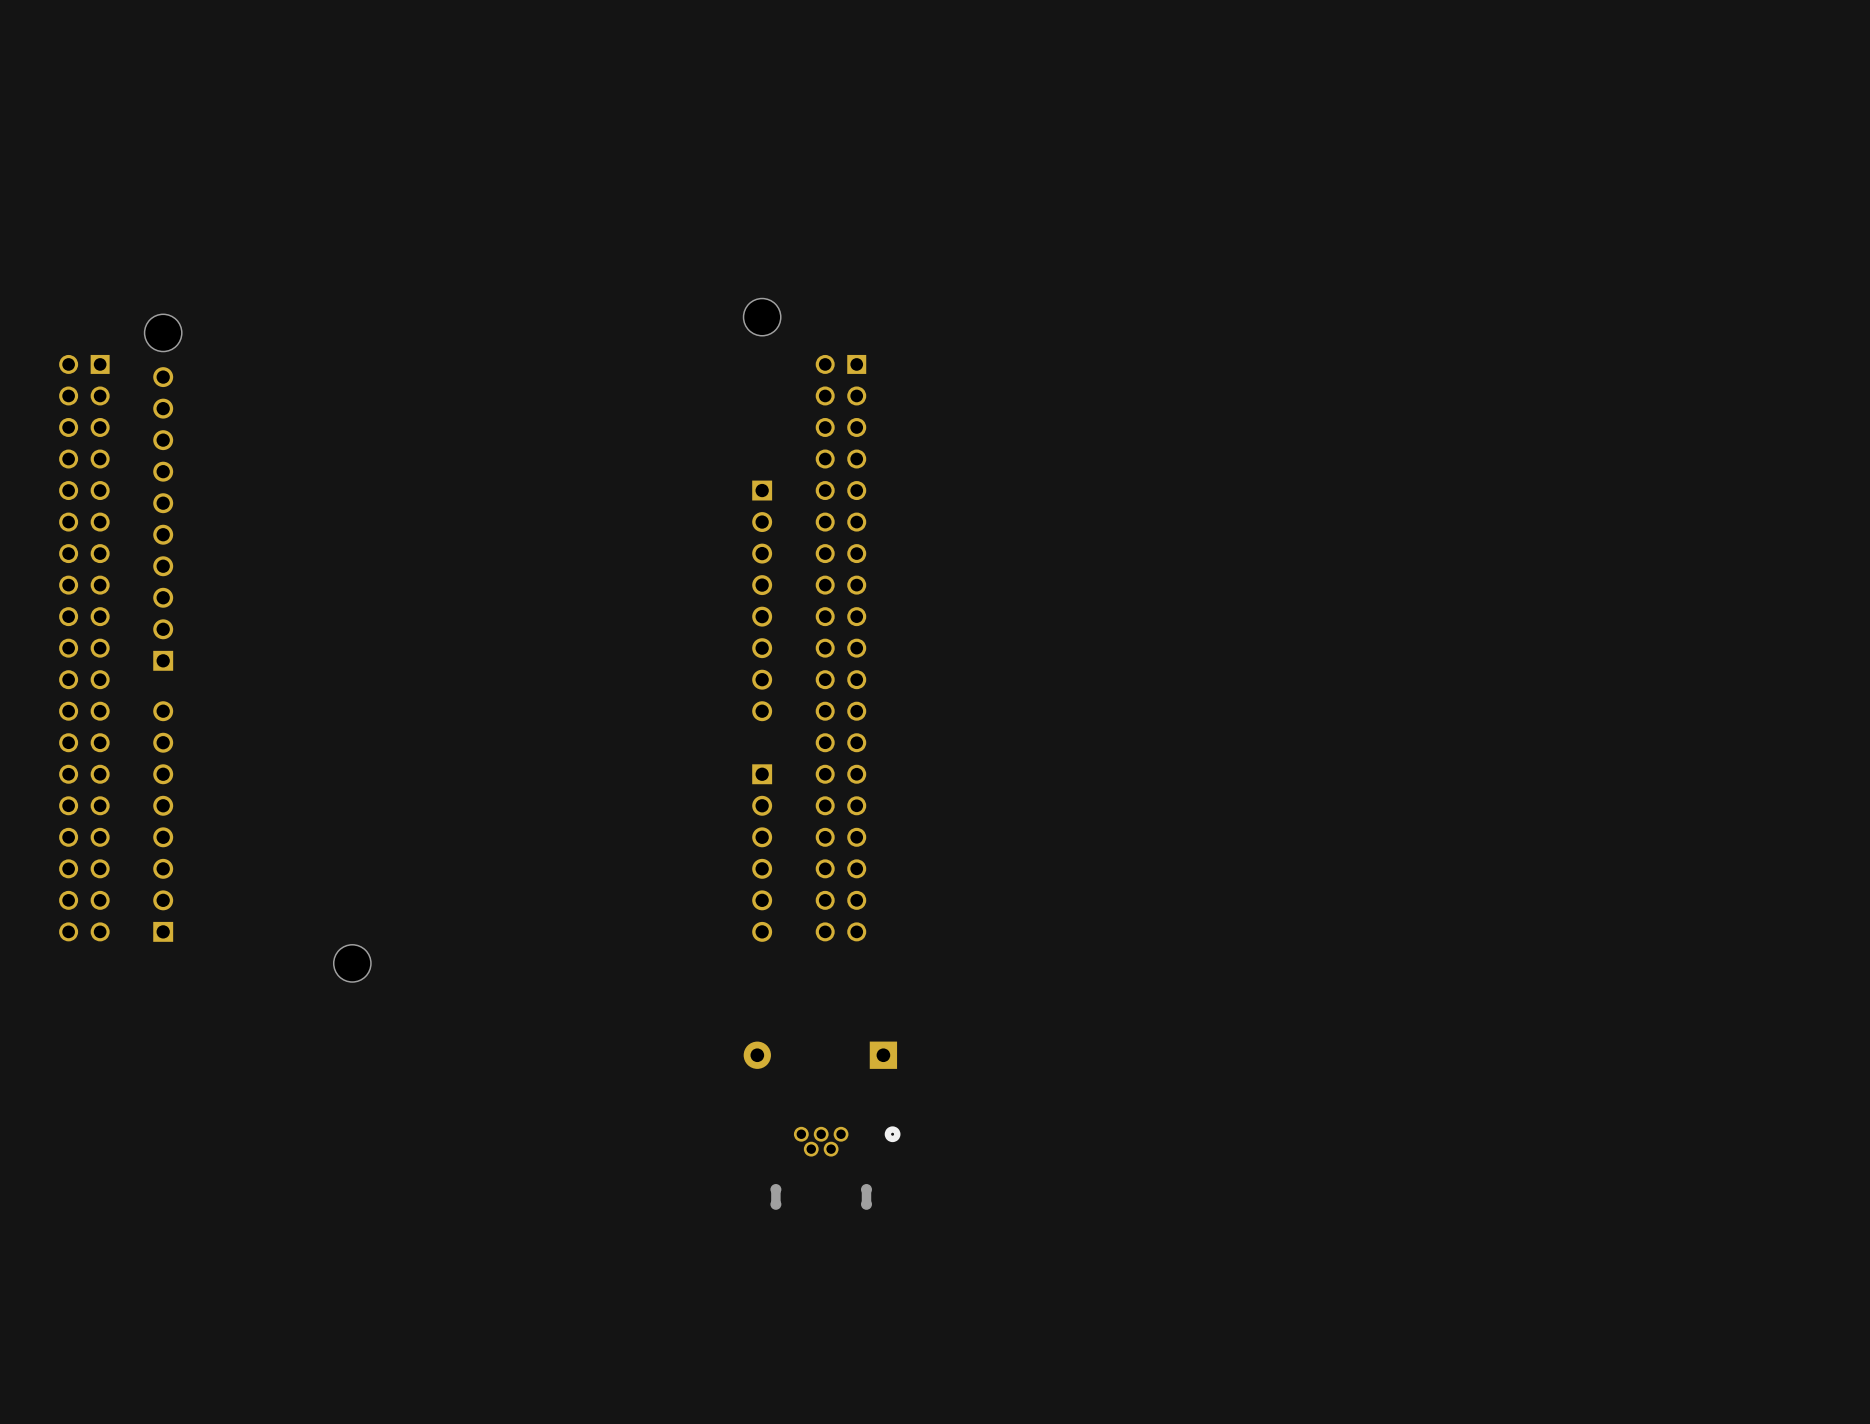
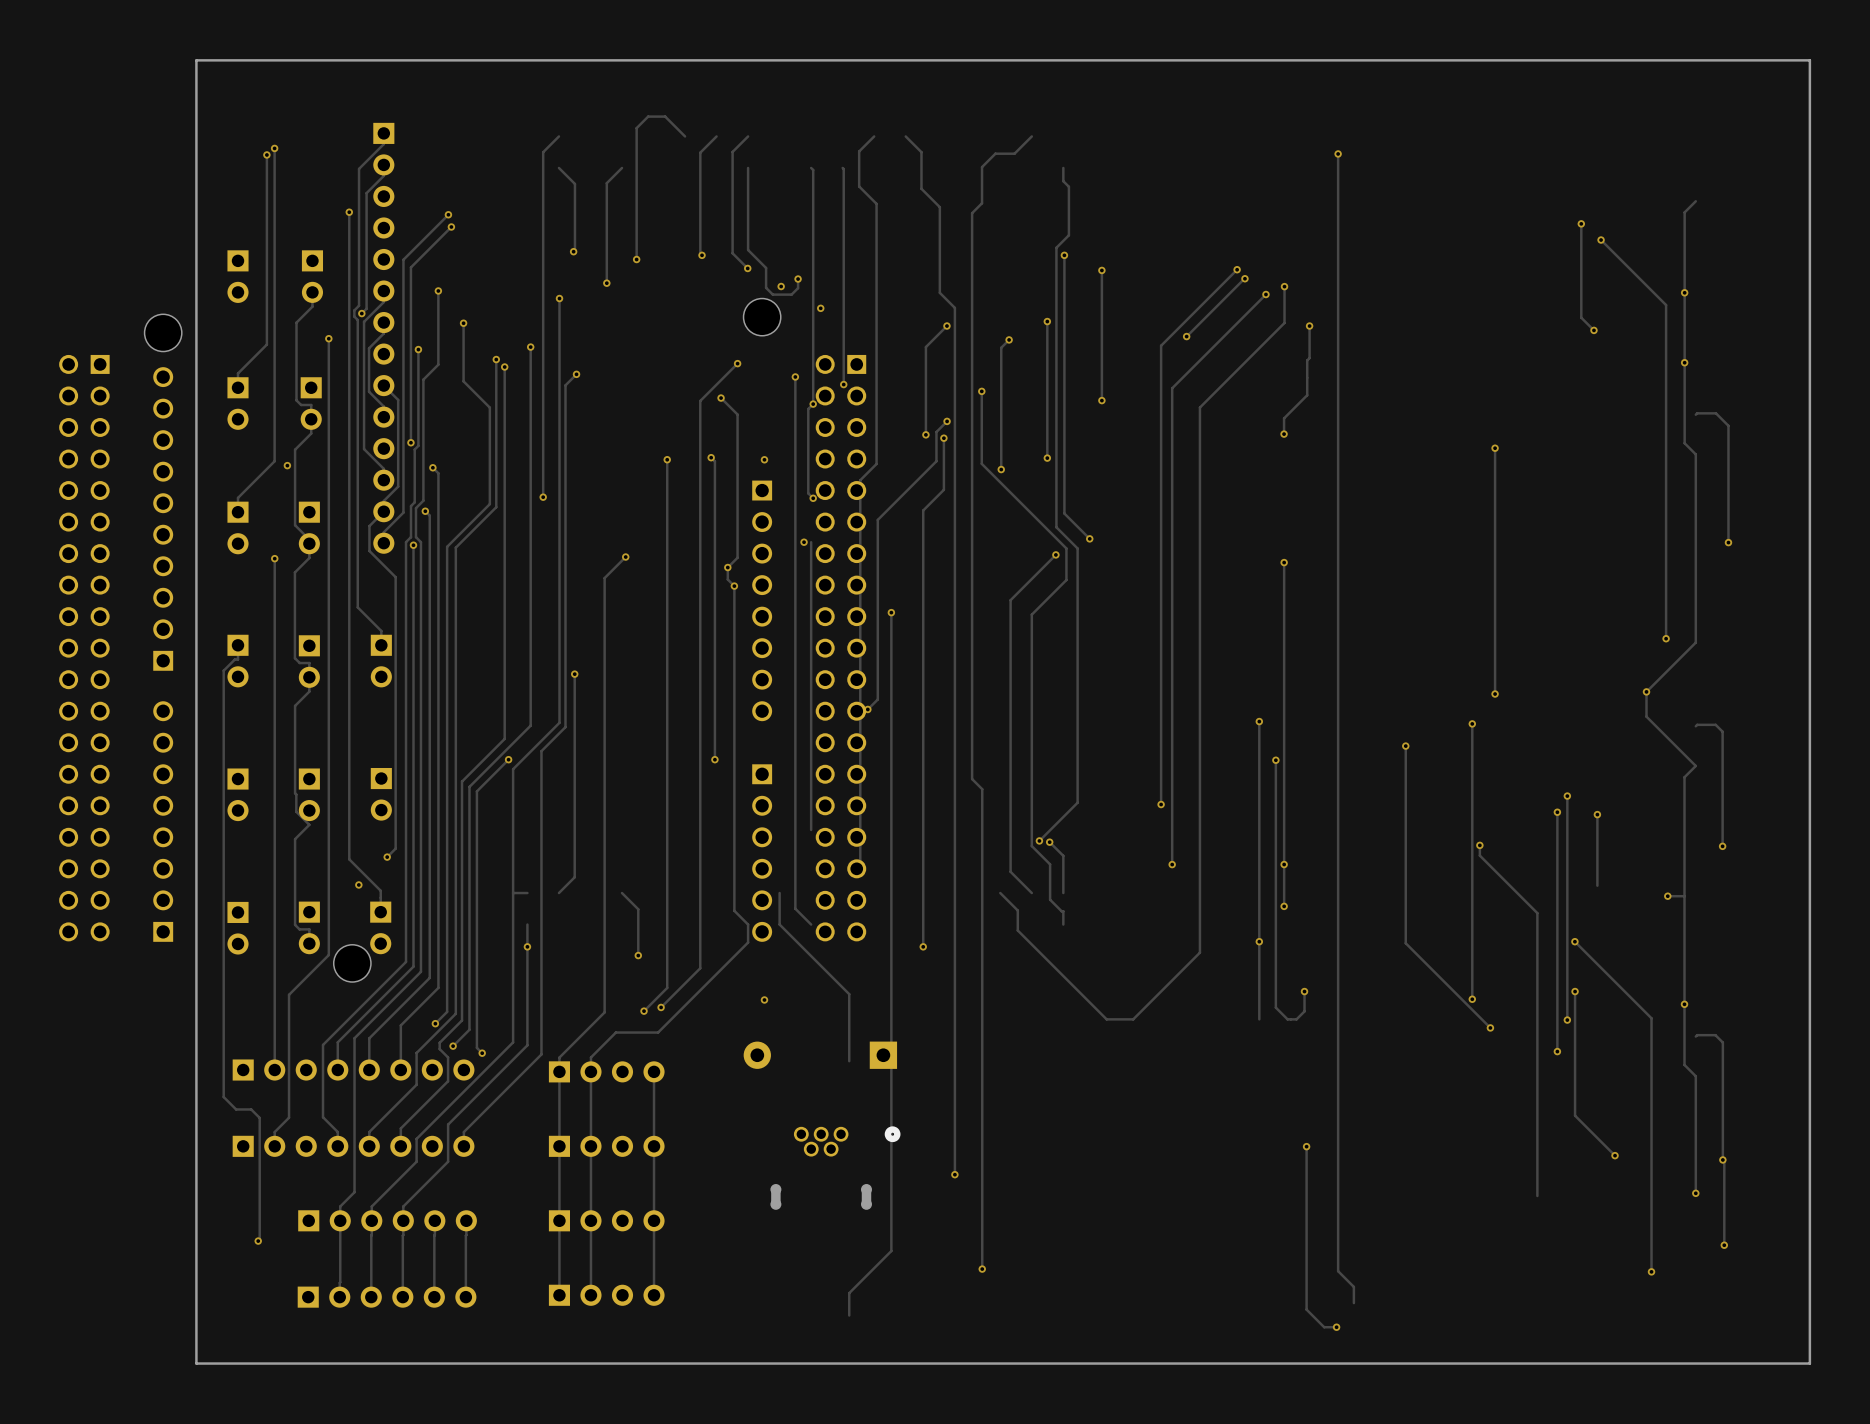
board edge: none -> (1809, 60) (196, 60) (196, 1363) (1809, 1363) (1809, 60)
track: none -> (383, 133) (383, 144) (359, 168) (359, 305) (354, 310) (354, 316) (357, 320) (357, 607) (381, 631) (381, 645)
track: none -> (558, 136) (543, 152) (543, 497)
track: none -> (685, 136) (665, 116) (648, 116) (636, 128) (636, 259)
track: none -> (716, 136) (700, 152) (700, 253) (702, 255)
track: none -> (748, 136) (732, 151) (732, 253) (747, 268)
track: none -> (874, 136) (859, 151) (859, 186) (876, 203) (876, 463) (860, 480) (860, 867)
track: none -> (905, 136) (921, 152) (921, 188) (939, 207) (939, 292) (954, 307) (954, 1174)
track: none -> (1031, 136) (1014, 153) (995, 153) (982, 167) (982, 203) (972, 213) (972, 779) (982, 789) (982, 1269)
track: none -> (274, 148) (274, 461) (238, 497) (238, 512)
via: none -> (274, 148)
track: none -> (1338, 153) (1338, 1271) (1353, 1286) (1353, 1303)
via: none -> (1338, 153)
track: none -> (266, 154) (266, 344) (238, 373) (238, 387)
via: none -> (266, 154)
track: none -> (383, 164) (383, 175) (366, 193) (366, 308) (361, 313)
track: none -> (558, 167) (574, 183) (573, 251)
track: none -> (622, 167) (606, 183) (606, 283)
track: none -> (748, 167) (748, 250) (766, 268) (766, 287) (772, 294) (791, 294) (798, 288) (798, 279)
track: none -> (811, 167) (813, 170) (813, 404) (808, 409) (808, 493) (813, 498)
track: none -> (842, 167) (843, 384)
track: none -> (1063, 167) (1063, 181) (1068, 186) (1068, 235) (1056, 247) (1056, 527) (1077, 548) (1077, 802) (1039, 840)
track: none -> (1695, 201) (1684, 212) (1684, 443) (1695, 454) (1695, 642) (1646, 691) (1646, 716) (1695, 765) (1684, 777) (1684, 1064) (1695, 1076) (1695, 1193)
track: none -> (349, 212) (349, 859) (380, 890) (380, 912)
via: none -> (349, 212)
track: none -> (448, 214) (403, 259) (403, 512) (383, 532) (383, 543)
via: none -> (448, 214)
track: none -> (1581, 223) (1581, 317) (1593, 330)
via: none -> (1581, 223)
track: none -> (451, 226) (410, 267) (410, 442)
via: none -> (451, 226)
track: none -> (1601, 240) (1666, 305) (1666, 638)
via: none -> (1601, 240)
via: none -> (573, 251)
via: none -> (702, 255)
track: none -> (1064, 255) (1064, 513) (1089, 538)
via: none -> (1064, 255)
via: none -> (636, 259)
via: none -> (747, 268)
track: none -> (1237, 269) (1161, 345) (1161, 804)
via: none -> (1237, 269)
track: none -> (1101, 270) (1101, 400)
via: none -> (1101, 270)
part: none -> (238, 276)
part: none -> (312, 276)
track: none -> (1244, 278) (1186, 336)
via: none -> (1244, 278)
via: none -> (798, 279)
via: none -> (606, 283)
via: none -> (781, 286)
track: none -> (1284, 286) (1284, 322) (1199, 407) (1199, 952) (1133, 1019) (1106, 1019) (1017, 930) (1017, 910) (1000, 893)
via: none -> (1284, 286)
track: none -> (438, 290) (438, 364) (423, 379) (423, 500) (415, 508) (415, 537) (420, 542) (420, 971) (354, 1038) (354, 1192) (340, 1206) (339, 1297)
via: none -> (438, 290)
track: none -> (383, 291) (383, 302) (364, 321) (364, 449) (383, 468) (383, 480)
track: none -> (312, 292) (312, 306) (296, 322) (296, 400) (301, 405) (311, 405) (311, 433) (295, 449) (295, 525) (309, 539) (309, 558) (294, 572) (294, 658) (299, 663) (309, 663) (309, 691) (295, 705) (296, 811) (309, 824) (295, 839) (295, 924) (299, 929) (309, 929) (309, 943)
via: none -> (1684, 292)
track: none -> (1265, 294) (1172, 388) (1172, 864)
via: none -> (1265, 294)
track: none -> (559, 298) (559, 722) (513, 769) (513, 1042) (416, 1138) (416, 1161) (371, 1206) (371, 1297)
via: none -> (559, 298)
via: none -> (820, 308)
via: none -> (361, 313)
track: none -> (1047, 321) (1047, 458)
via: none -> (1047, 321)
track: none -> (383, 322) (383, 333) (369, 348) (369, 391) (383, 406) (383, 417)
track: none -> (463, 323) (463, 381) (489, 407) (489, 504) (447, 546) (447, 1011) (435, 1023)
via: none -> (463, 323)
track: none -> (946, 326) (925, 347) (925, 434)
via: none -> (946, 326)
track: none -> (1309, 326) (1307, 395) (1284, 418) (1284, 434)
via: none -> (1309, 326)
via: none -> (1593, 330)
via: none -> (1186, 336)
track: none -> (328, 338) (328, 955) (289, 994) (289, 1117) (274, 1132) (274, 1146)
via: none -> (328, 338)
part: none -> (383, 338)
track: none -> (1009, 339) (1001, 347) (1001, 469)
via: none -> (1009, 339)
track: none -> (530, 347) (530, 725) (469, 786) (469, 1029) (453, 1046)
via: none -> (530, 347)
track: none -> (418, 349) (418, 445) (414, 449) (414, 502) (411, 506) (411, 537) (406, 542) (406, 961) (323, 1044) (323, 1117) (337, 1132) (337, 1146)
via: none -> (418, 349)
track: none -> (496, 359) (496, 507) (455, 547) (455, 1013) (416, 1053) (416, 1084) (369, 1132) (369, 1146)
via: none -> (496, 359)
via: none -> (1684, 362)
track: none -> (737, 363) (700, 400) (700, 968) (661, 1007)
via: none -> (737, 363)
track: none -> (504, 366) (504, 738) (462, 781) (462, 1020) (439, 1042) (439, 1049) (448, 1057) (448, 1081) (400, 1128) (400, 1146)
via: none -> (504, 366)
track: none -> (576, 374) (565, 385) (565, 727) (541, 751) (541, 1054) (463, 1132) (463, 1146)
via: none -> (576, 374)
track: none -> (795, 376) (795, 908) (811, 924)
via: none -> (795, 376)
via: none -> (843, 384)
track: none -> (383, 385) (398, 399) (398, 486) (383, 500) (383, 511) (369, 526) (369, 550) (395, 577) (395, 848) (387, 857)
track: none -> (981, 391) (981, 463) (1066, 548) (1066, 580) (1031, 614) (1031, 846) (1050, 864) (1050, 899) (1063, 911) (1063, 924)
via: none -> (981, 391)
track: none -> (721, 398) (737, 414) (737, 557) (727, 567) (727, 579) (734, 586) (734, 910) (748, 924) (748, 942) (658, 1032) (615, 1032) (590, 1057) (590, 1071) (598, 1071) (590, 1079) (590, 1295)
via: none -> (721, 398)
via: none -> (1101, 400)
part: none -> (238, 403)
part: none -> (311, 403)
via: none -> (813, 404)
track: none -> (1695, 414) (1715, 413) (1728, 425) (1728, 542)
track: none -> (947, 421) (936, 432) (936, 461) (877, 519) (877, 699) (867, 709)
via: none -> (947, 421)
via: none -> (925, 434)
via: none -> (1284, 434)
track: none -> (943, 438) (943, 489) (923, 510) (923, 946)
via: none -> (943, 438)
via: none -> (410, 442)
track: none -> (1495, 448) (1495, 694)
via: none -> (1495, 448)
track: none -> (711, 457) (714, 461) (714, 759)
via: none -> (711, 457)
via: none -> (1047, 458)
track: none -> (667, 459) (667, 987) (644, 1011)
via: none -> (667, 459)
via: none -> (764, 459)
via: none -> (287, 465)
track: none -> (432, 467) (438, 473) (438, 987) (400, 1025) (400, 1070)
via: none -> (432, 467)
via: none -> (1001, 469)
via: none -> (543, 497)
via: none -> (813, 498)
track: none -> (425, 511) (429, 515) (429, 977) (369, 1038) (369, 1070)
via: none -> (425, 511)
part: none -> (238, 527)
part: none -> (309, 527)
via: none -> (1089, 538)
via: none -> (804, 542)
track: none -> (811, 542) (811, 829)
via: none -> (1728, 542)
track: none -> (413, 545) (413, 966) (337, 1042) (337, 1070)
via: none -> (413, 545)
track: none -> (1055, 554) (1010, 600) (1010, 871) (1031, 893)
via: none -> (1055, 554)
track: none -> (625, 557) (604, 578) (604, 1012) (559, 1057) (559, 1295)
via: none -> (625, 557)
track: none -> (274, 558) (274, 1070)
via: none -> (274, 558)
track: none -> (1284, 562) (1284, 906)
via: none -> (1284, 562)
via: none -> (727, 567)
via: none -> (734, 586)
track: none -> (891, 612) (891, 1251) (849, 1293) (849, 1315)
via: none -> (891, 612)
via: none -> (1666, 638)
track: none -> (238, 645) (238, 659) (234, 659) (223, 670) (223, 1097) (236, 1109) (251, 1109) (259, 1117) (258, 1241)
part: none -> (238, 661)
part: none -> (309, 661)
part: none -> (381, 661)
track: none -> (574, 674) (574, 877) (558, 893)
via: none -> (574, 674)
via: none -> (1646, 691)
via: none -> (1495, 694)
via: none -> (867, 709)
track: none -> (1259, 721) (1259, 1019)
via: none -> (1259, 721)
track: none -> (1472, 723) (1472, 999)
via: none -> (1472, 723)
track: none -> (1695, 726) (1715, 724) (1722, 731) (1722, 846)
track: none -> (1405, 746) (1405, 943) (1490, 1027)
via: none -> (1405, 746)
track: none -> (508, 759) (476, 791) (476, 1047) (482, 1053)
via: none -> (508, 759)
via: none -> (714, 759)
track: none -> (1275, 760) (1275, 1007) (1287, 1019) (1296, 1019) (1304, 1011) (1304, 991)
via: none -> (1275, 760)
part: none -> (238, 794)
part: none -> (309, 794)
part: none -> (381, 794)
track: none -> (1567, 796) (1567, 1020)
via: none -> (1567, 796)
via: none -> (1161, 804)
track: none -> (1557, 812) (1557, 1051)
via: none -> (1557, 812)
track: none -> (1597, 814) (1597, 885)
via: none -> (1597, 814)
via: none -> (1039, 840)
track: none -> (1049, 842) (1063, 855) (1063, 893)
via: none -> (1049, 842)
track: none -> (1479, 845) (1479, 855) (1537, 913) (1537, 1195)
via: none -> (1479, 845)
via: none -> (1722, 846)
via: none -> (387, 857)
via: none -> (1172, 864)
via: none -> (1284, 864)
via: none -> (358, 884)
track: none -> (527, 893) (513, 893)
track: none -> (622, 893) (638, 909) (638, 955)
track: none -> (779, 893) (779, 924) (849, 994) (849, 1061)
via: none -> (1667, 896)
track: none -> (1684, 896) (1667, 896)
via: none -> (1284, 906)
track: none -> (527, 924) (527, 1045) (448, 1124) (448, 1161) (403, 1206) (402, 1297)
part: none -> (309, 927)
part: none -> (380, 927)
part: none -> (238, 928)
via: none -> (1259, 941)
track: none -> (1574, 941) (1651, 1018) (1651, 1271)
via: none -> (1574, 941)
via: none -> (527, 946)
via: none -> (923, 946)
via: none -> (638, 955)
via: none -> (1304, 991)
track: none -> (1575, 991) (1575, 1115) (1615, 1155)
via: none -> (1575, 991)
via: none -> (764, 999)
via: none -> (1472, 999)
via: none -> (1684, 1004)
via: none -> (661, 1007)
via: none -> (644, 1011)
via: none -> (1567, 1020)
via: none -> (435, 1023)
via: none -> (1490, 1027)
track: none -> (1695, 1036) (1715, 1035) (1722, 1042) (1724, 1245)
via: none -> (453, 1046)
via: none -> (1557, 1051)
via: none -> (482, 1053)
part: none -> (353, 1070)
part: none -> (606, 1071)
track: none -> (654, 1071) (654, 1295)
part: none -> (353, 1146)
part: none -> (606, 1146)
track: none -> (1306, 1146) (1306, 1309) (1324, 1327) (1336, 1327)
via: none -> (1306, 1146)
via: none -> (1615, 1155)
via: none -> (1722, 1159)
via: none -> (954, 1174)
via: none -> (1695, 1193)
part: none -> (387, 1220)
track: none -> (434, 1220) (434, 1297)
track: none -> (466, 1220) (465, 1297)
part: none -> (606, 1220)
via: none -> (258, 1241)
via: none -> (1724, 1245)
via: none -> (982, 1269)
via: none -> (1651, 1271)
part: none -> (606, 1295)
part: none -> (387, 1297)
via: none -> (1336, 1327)

